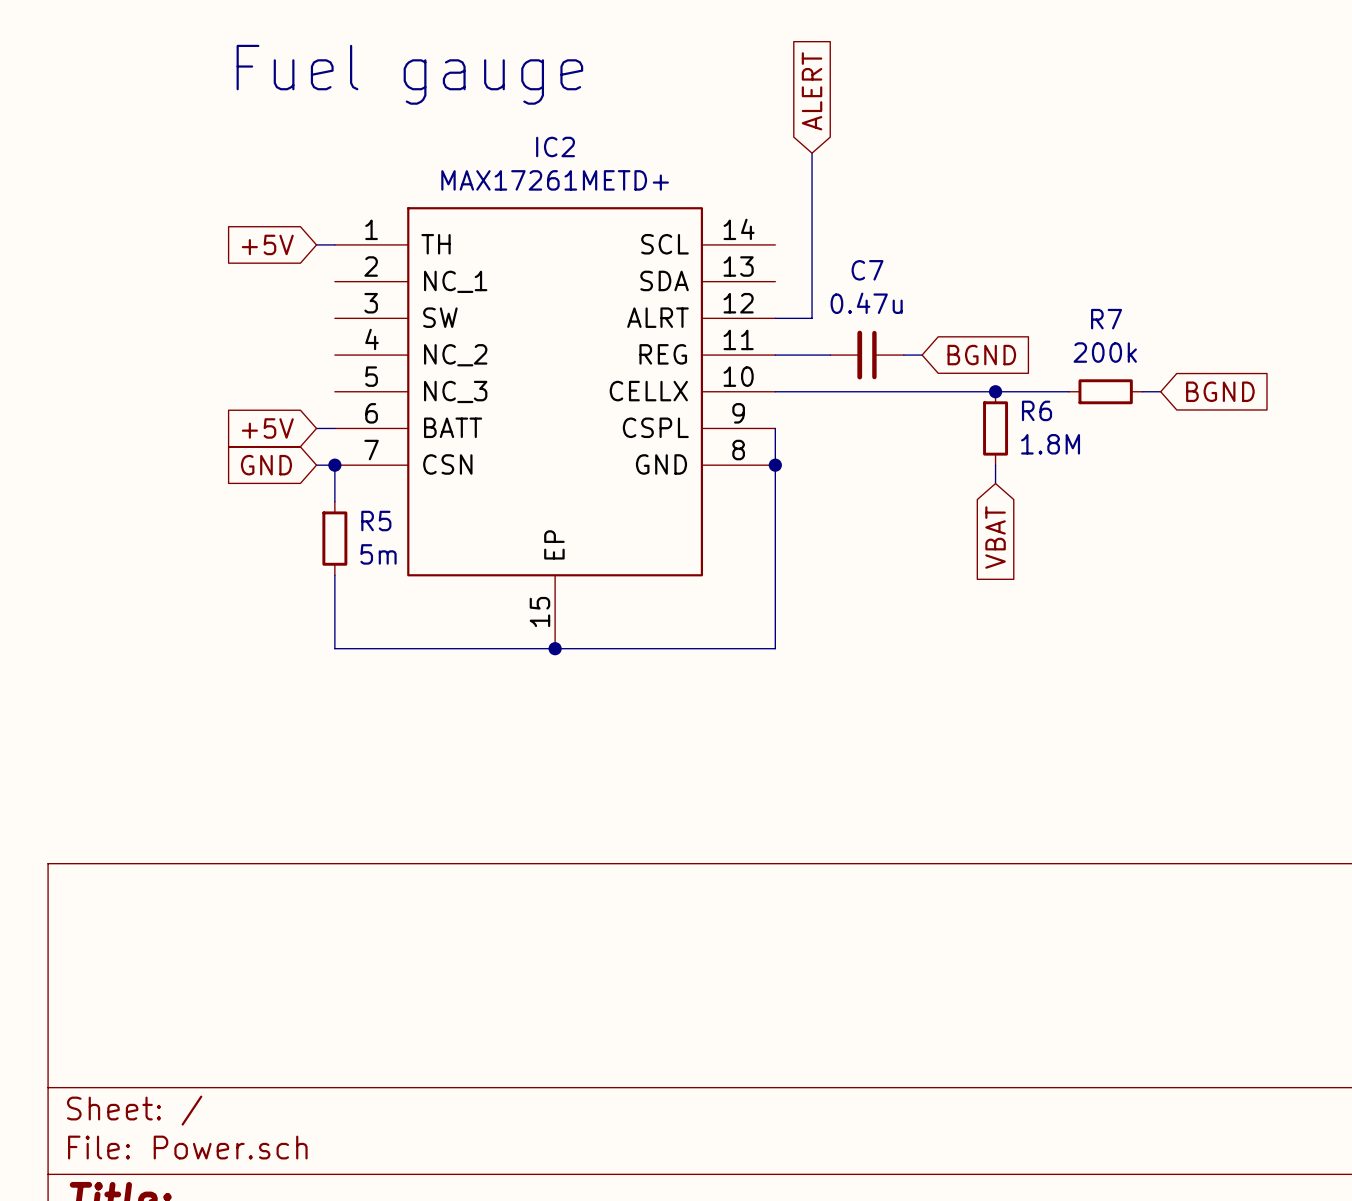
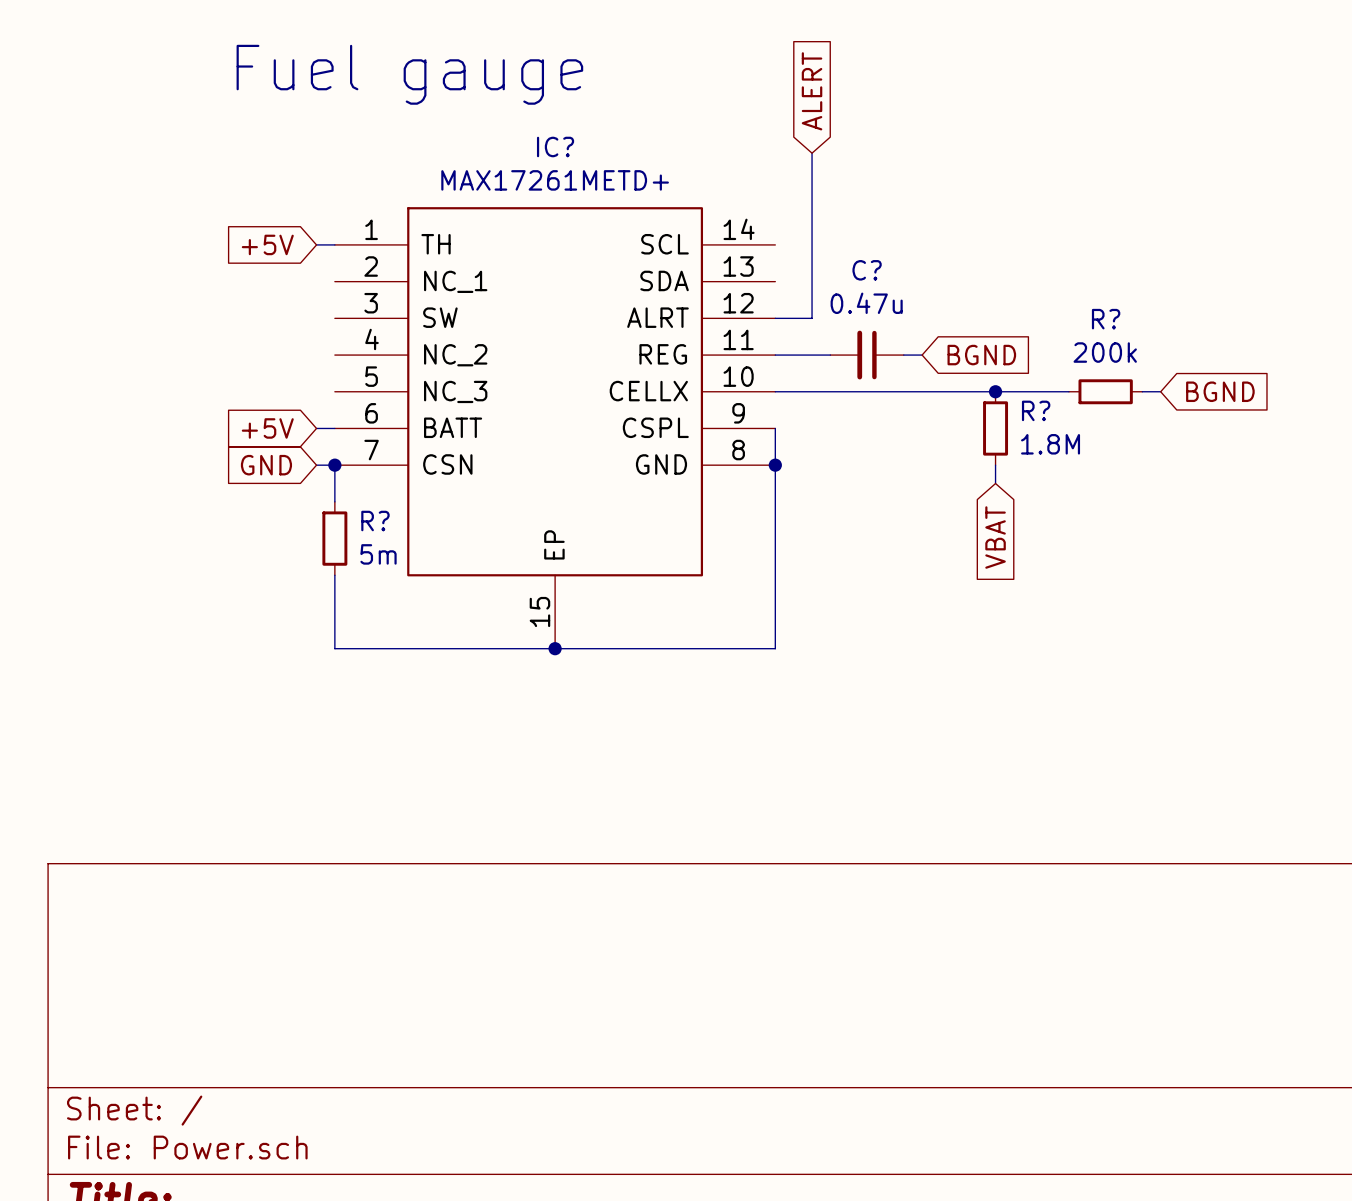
IC2 name: IC2 (555, 146) -> IC? (555, 146)
C7 name: C7 (867, 270) -> C? (867, 270)
R7 name: R7 (1106, 319) -> R? (1106, 319)
R6 name: R6 (1037, 410) -> R? (1036, 410)
R5 name: R5 (376, 521) -> R? (375, 521)

